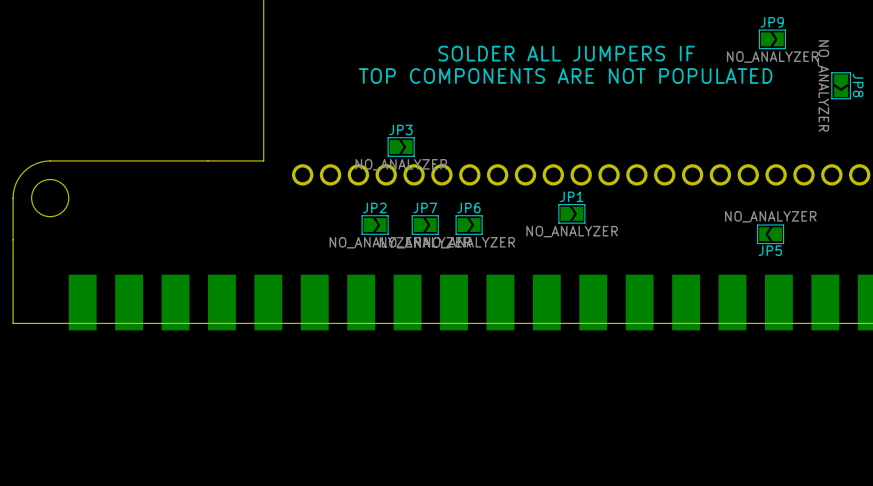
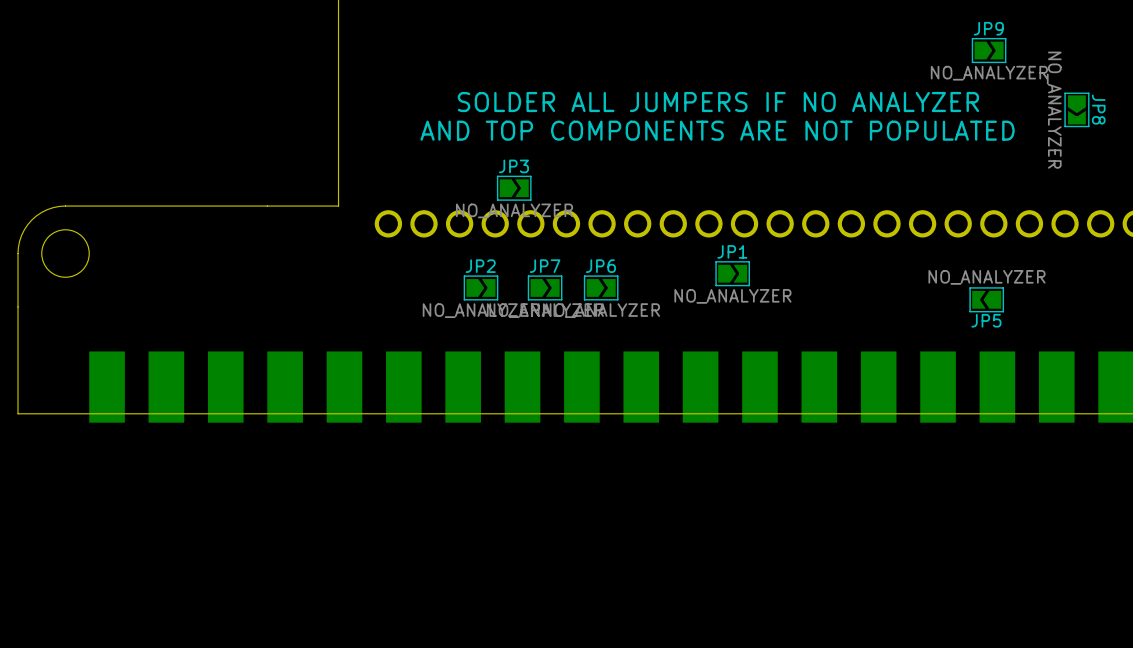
text: SOLDER ALL JUMPERS IF (566, 53) -> none
text: TOP COMPONENTS ARE NOT POPULATED (565, 76) -> SOLDER ALL JUMPERS IF NO ANALYZER (718, 102)
text: none -> AND TOP COMPONENTS ARE NOT POPULATED (717, 130)

